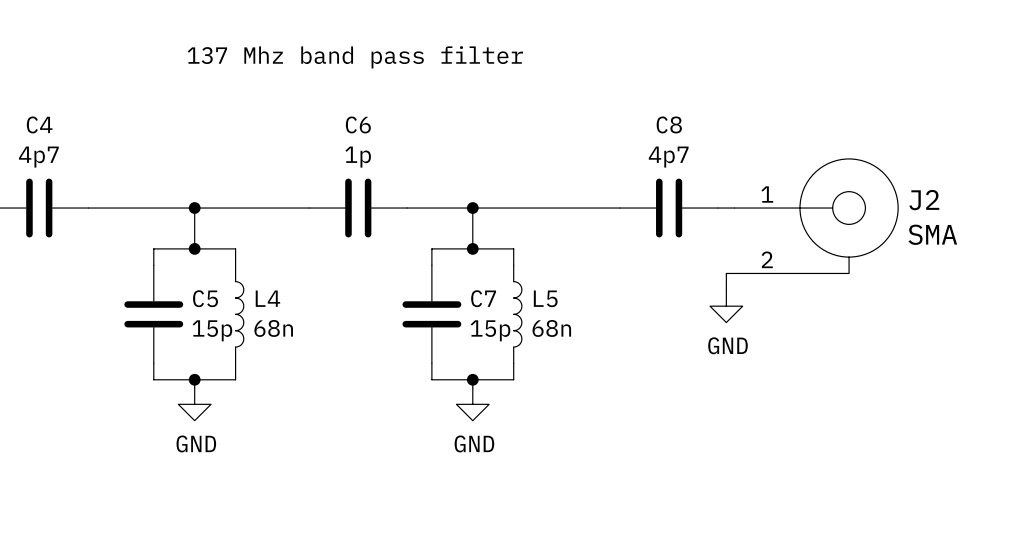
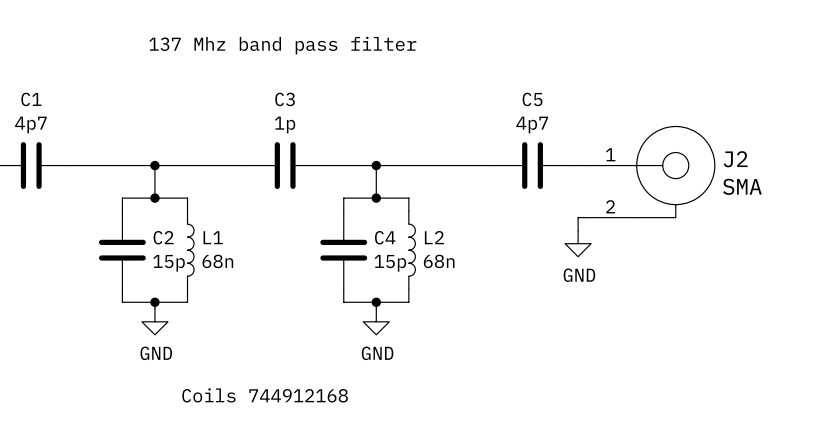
C4 name: C4 (39, 124) -> C1 (31, 99)
C6 name: C6 (358, 124) -> C3 (285, 99)
C8 name: C8 (669, 124) -> C5 (532, 99)
C5 name: C5 (205, 298) -> C2 (163, 237)
L4 name: L4 (267, 298) -> L1 (213, 237)
C7 name: C7 (483, 298) -> C4 (385, 237)
L5 name: L5 (545, 298) -> L2 (434, 237)
text: none -> Coils 744912168 (265, 395)

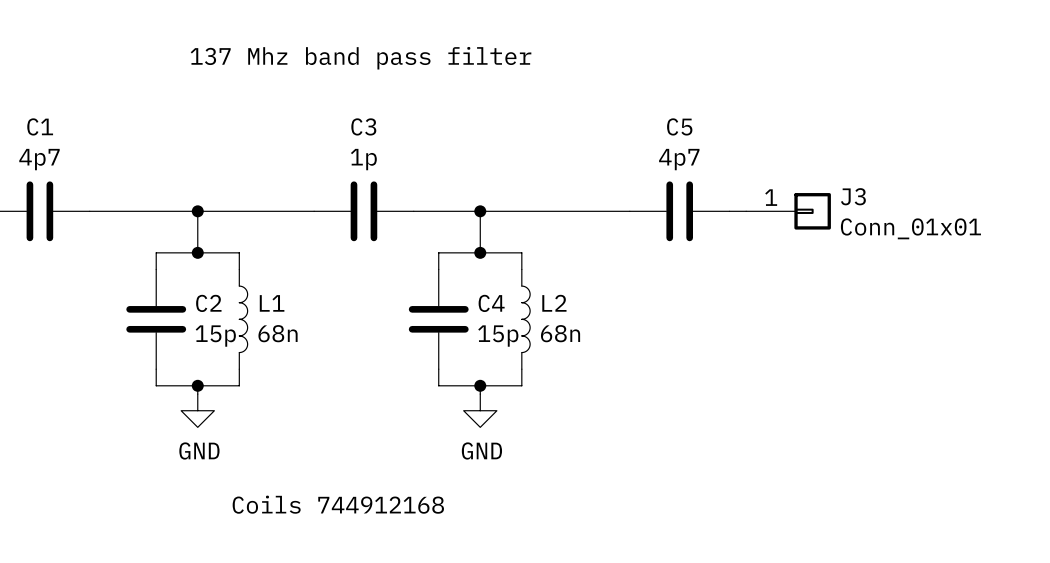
J3: none -> Conn_01x01 (788, 211)
J2: SMA (649, 172) -> none
wire: (584, 217) (578, 217) (578, 230) -> none
power symbol: GND (578, 243) -> none

